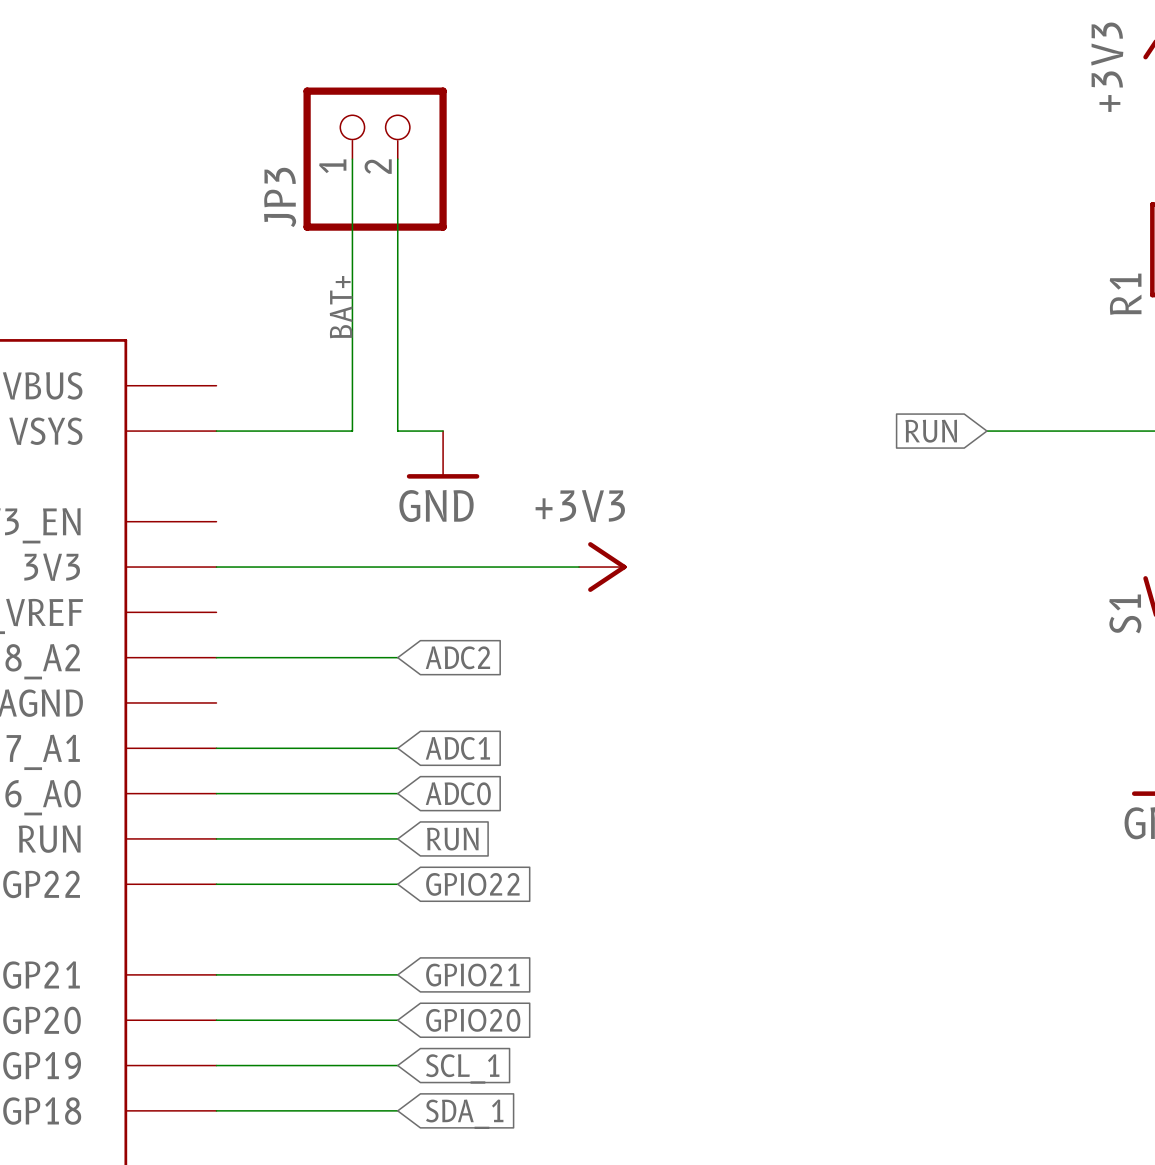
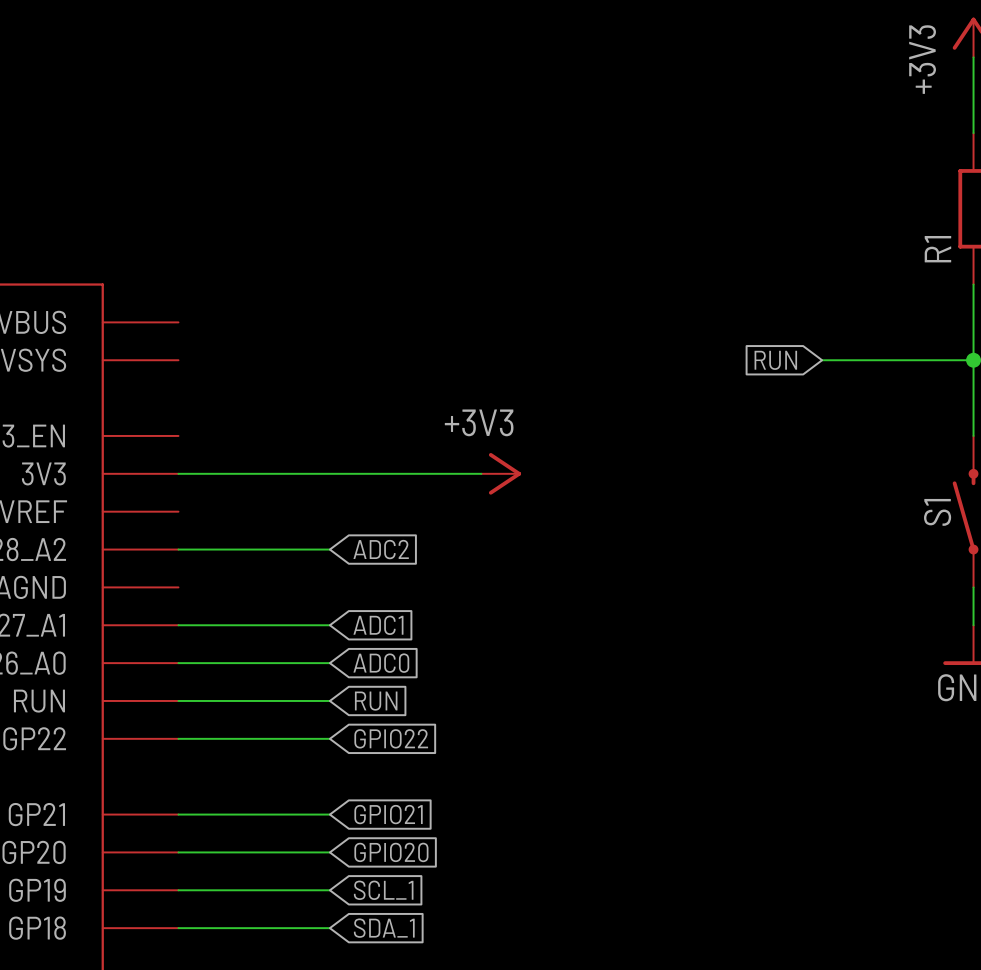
wire: (352, 159) (352, 431) (216, 431) -> none
JP3: (375, 159) -> none
wire: (397, 159) (397, 431) (443, 431) -> none
label: BAT+ (341, 307) -> none
power symbol: GND (443, 454) -> none

